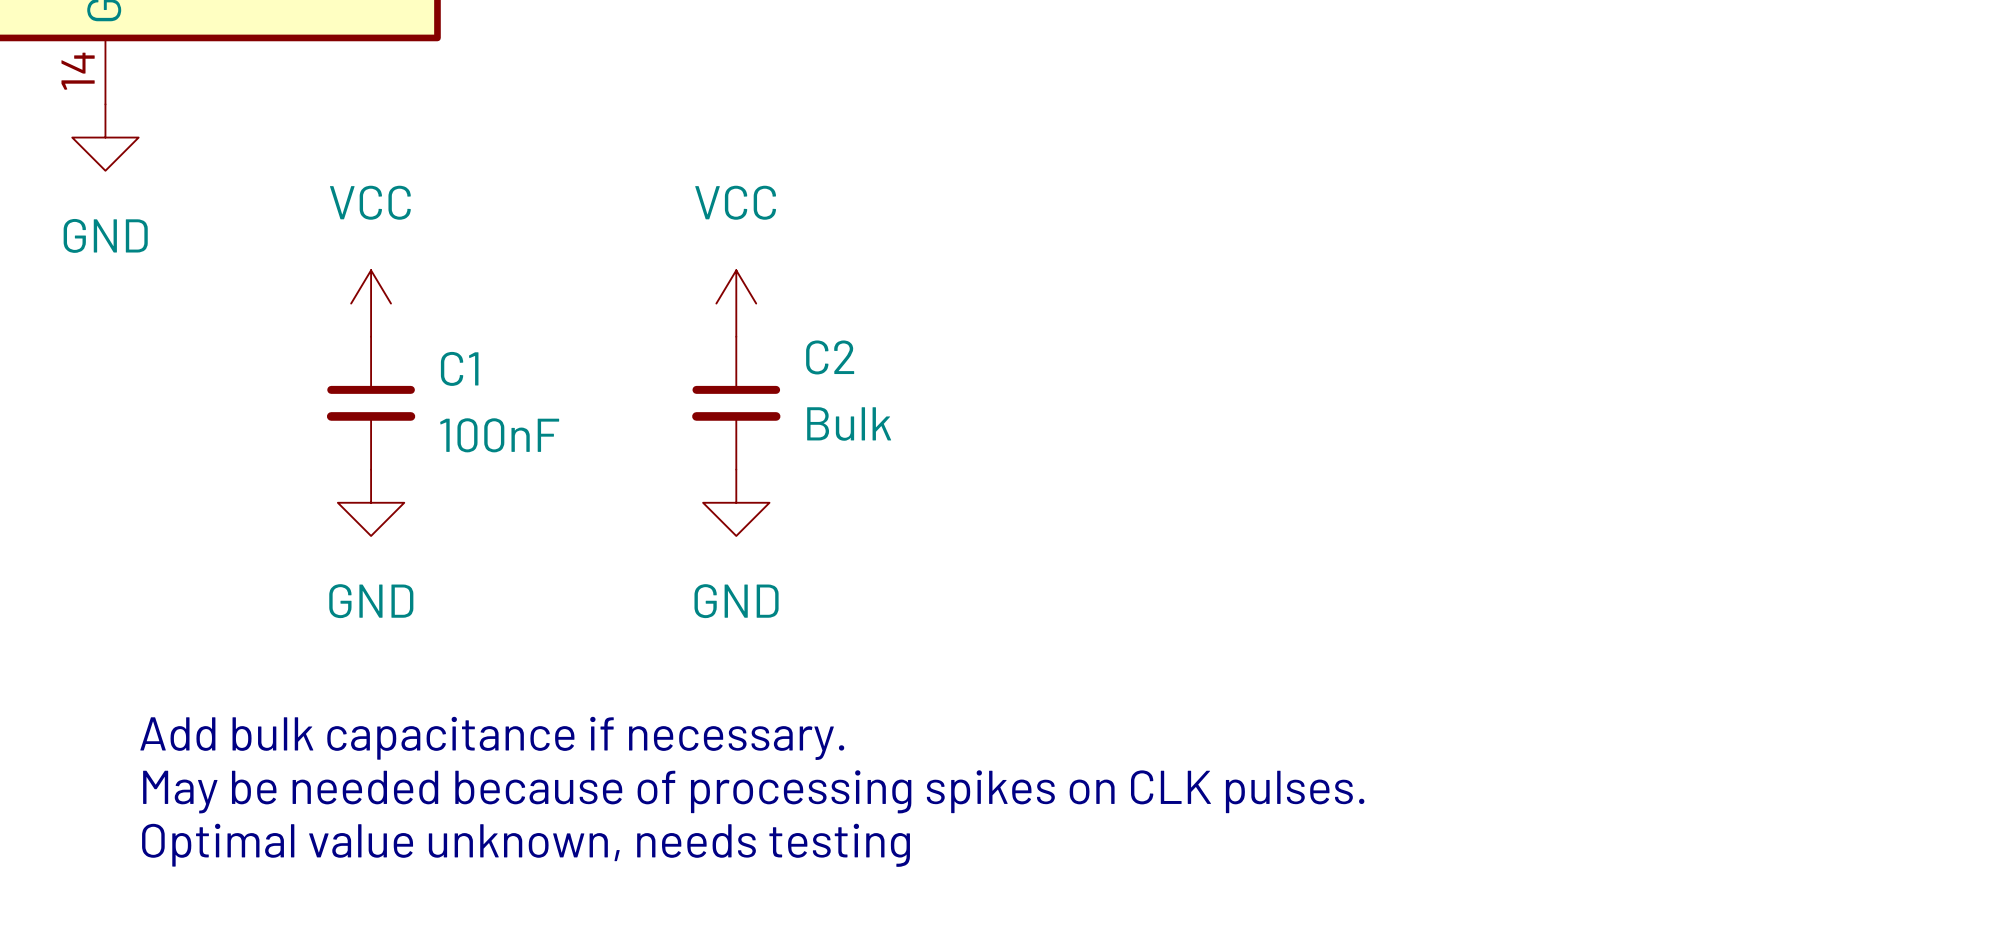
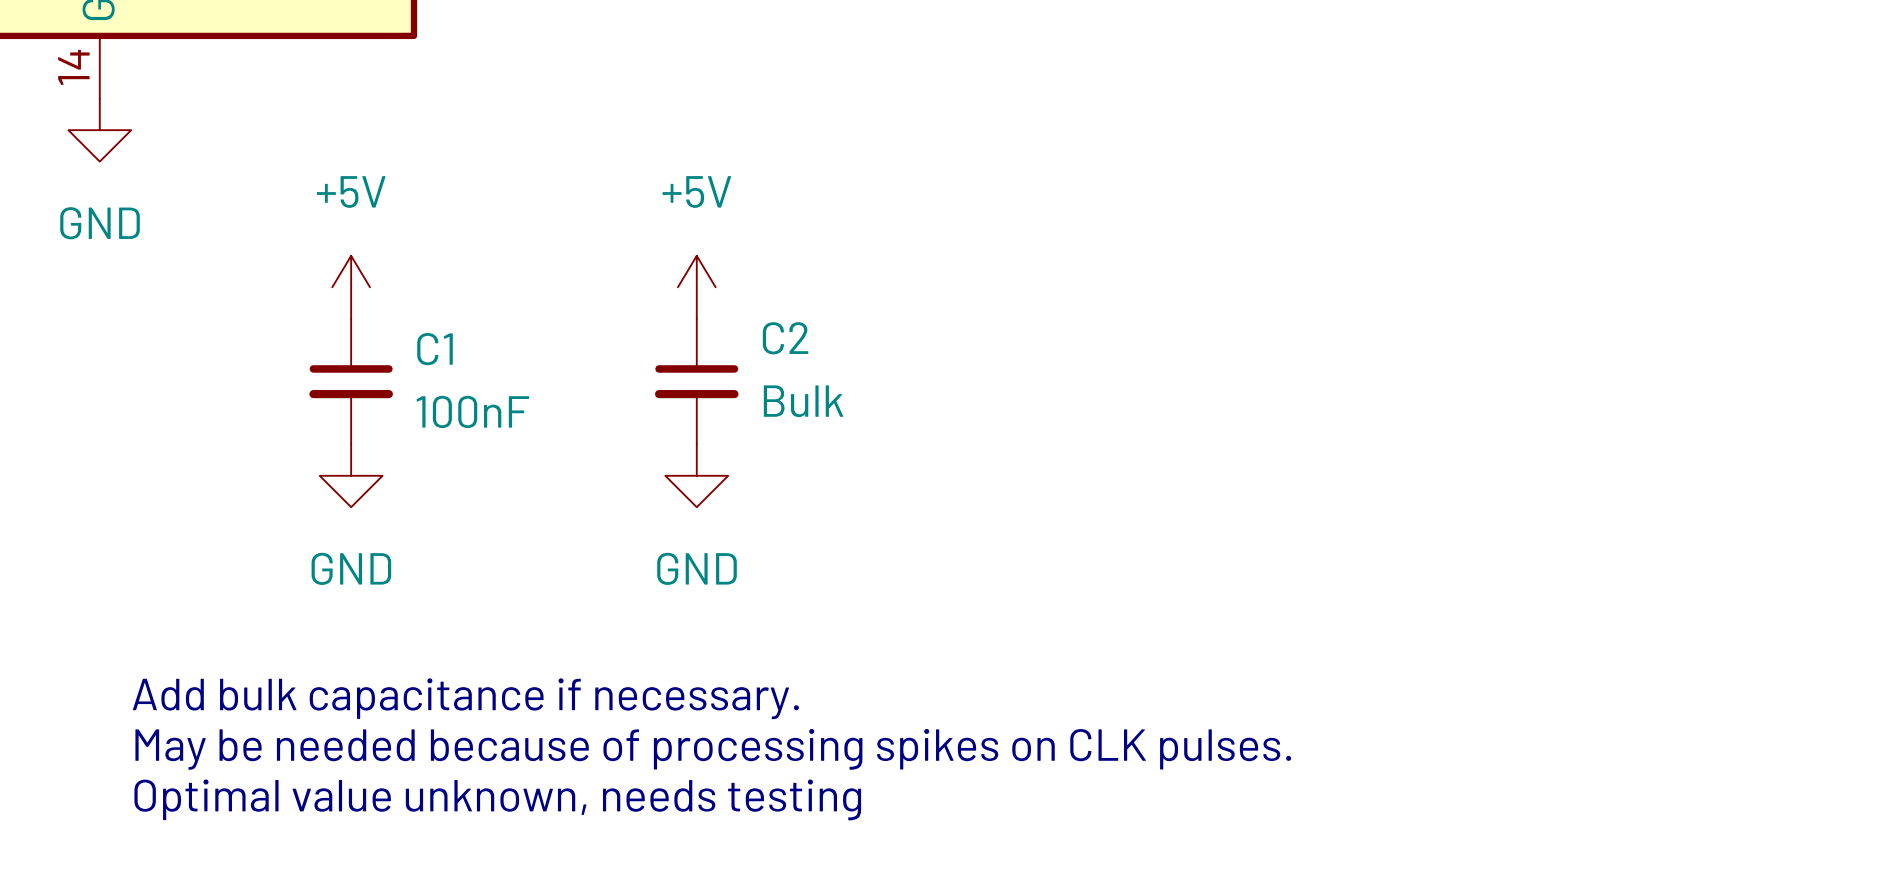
power symbol: VCC (371, 303) -> +5V (351, 287)
power symbol: VCC (736, 303) -> +5V (696, 287)

